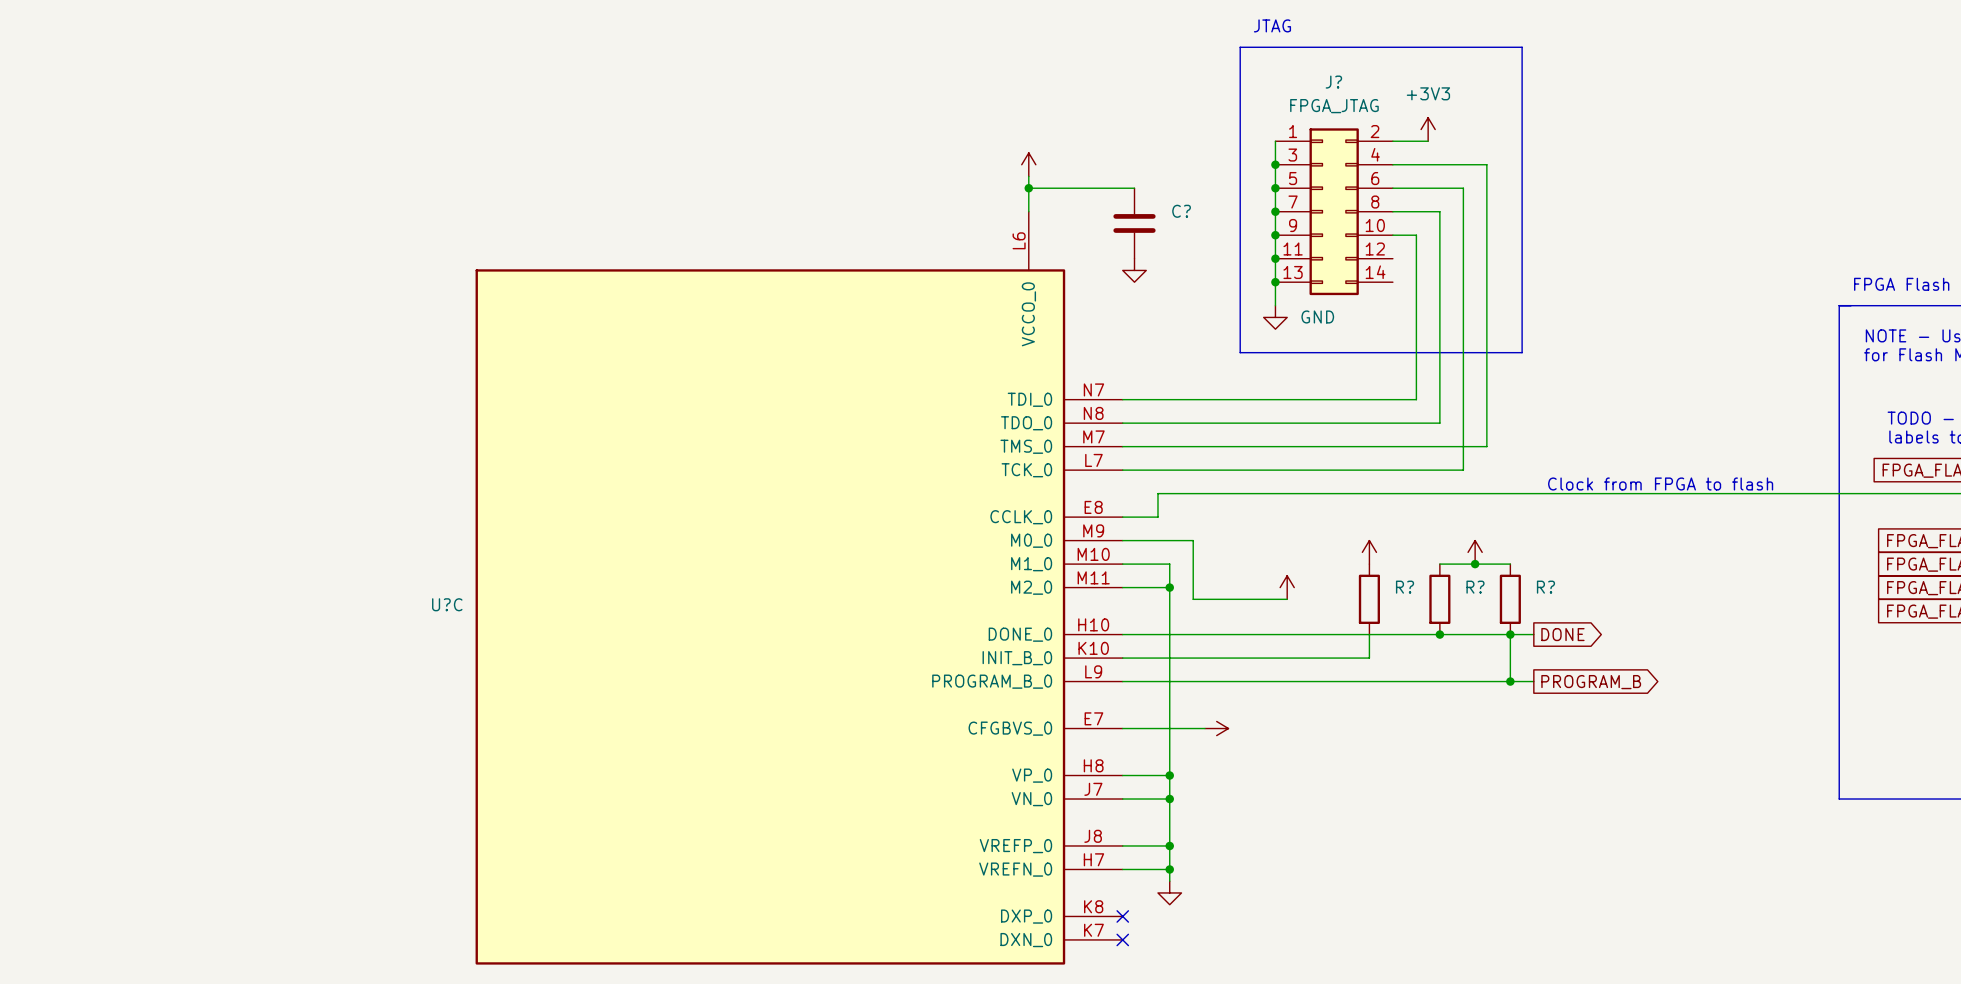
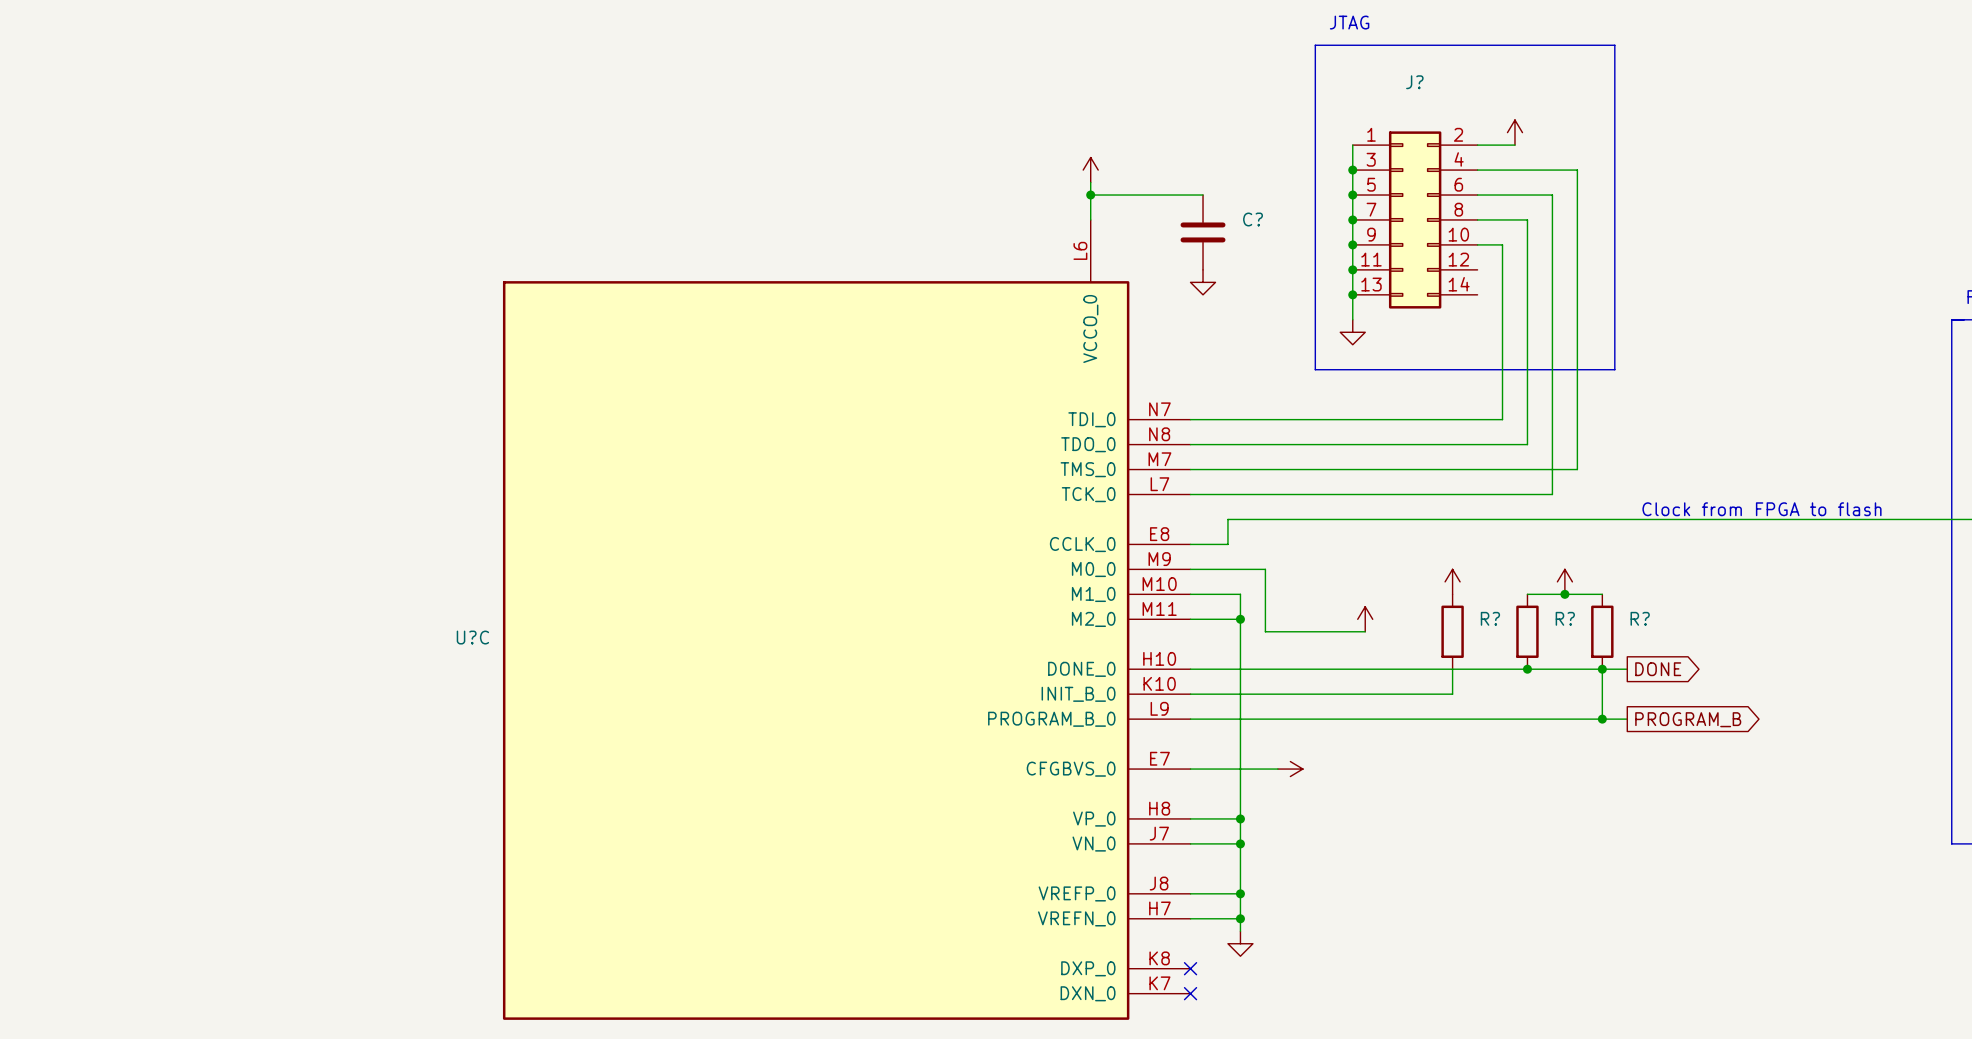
power symbol text: +3V3 (1428, 93) -> none
J? value: FPGA_JTAG (1334, 106) -> none
power symbol text: GND (1317, 316) -> none

